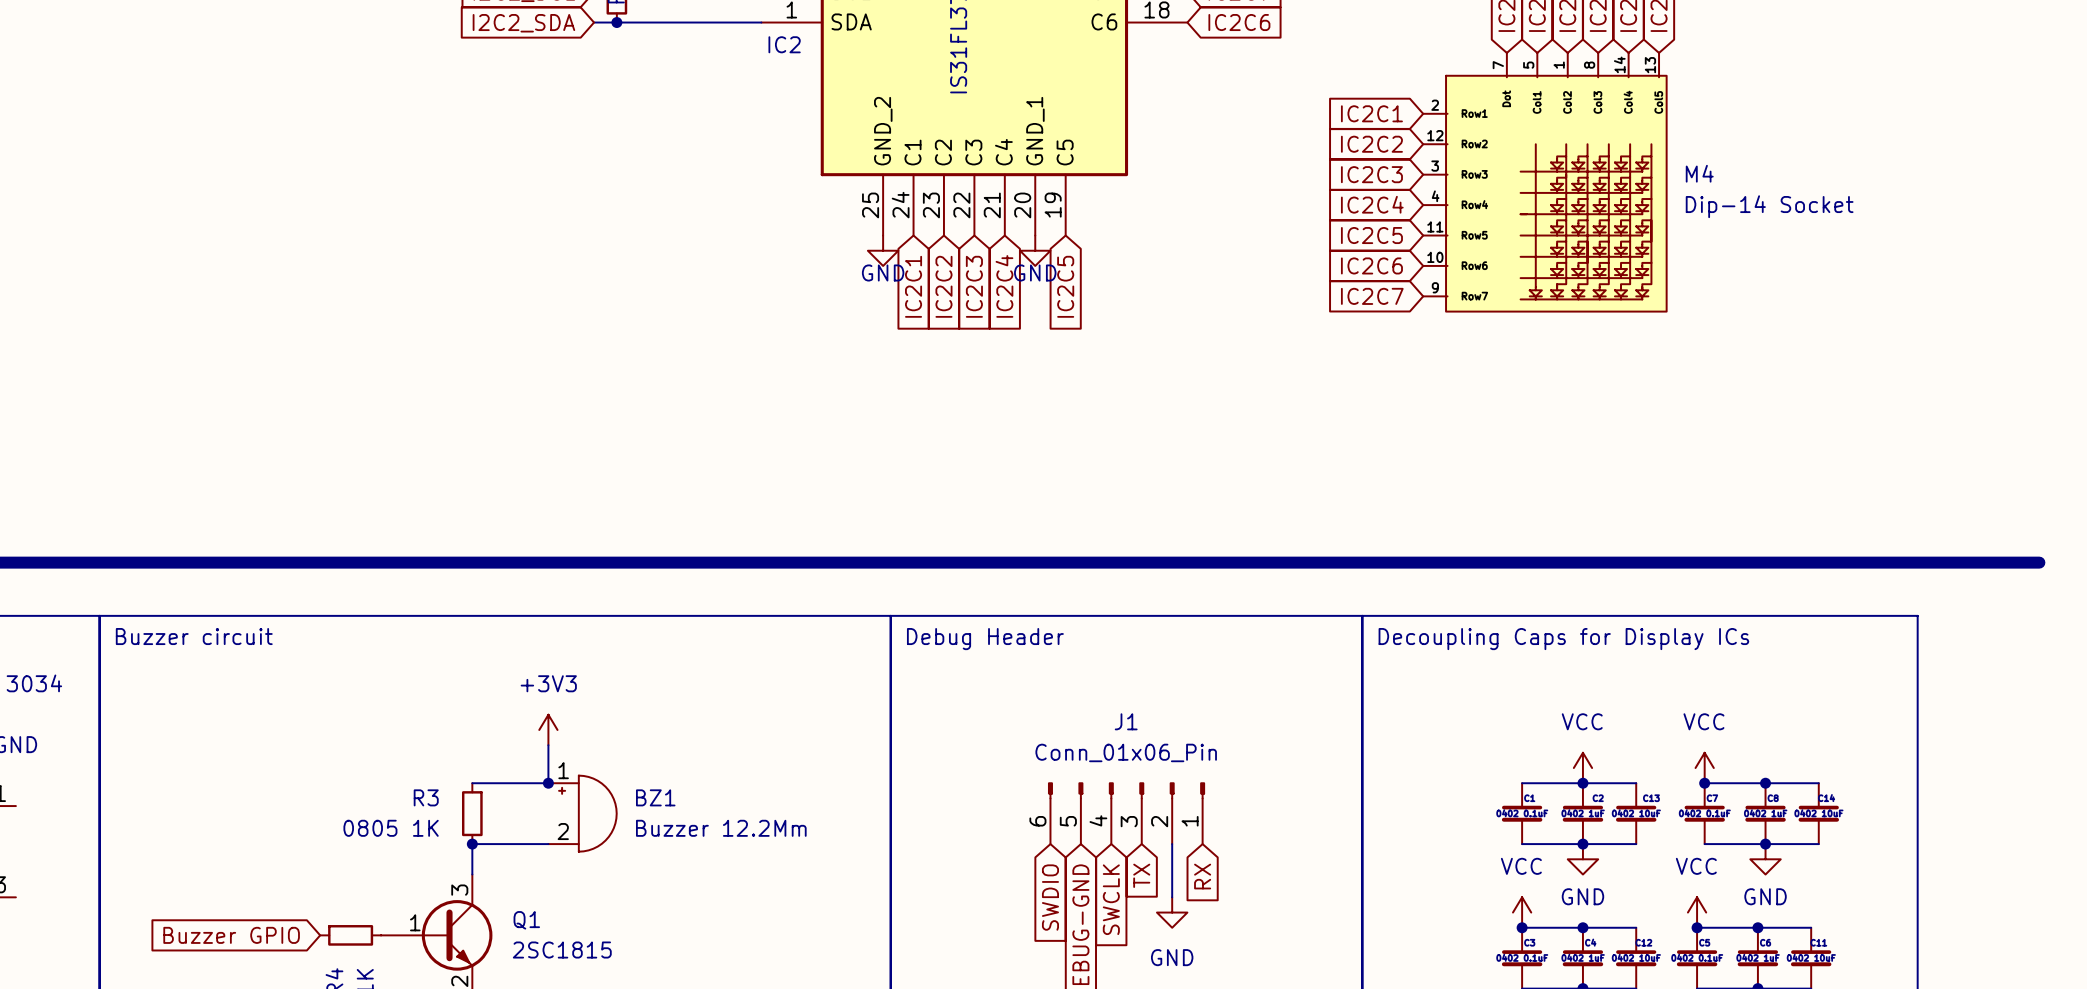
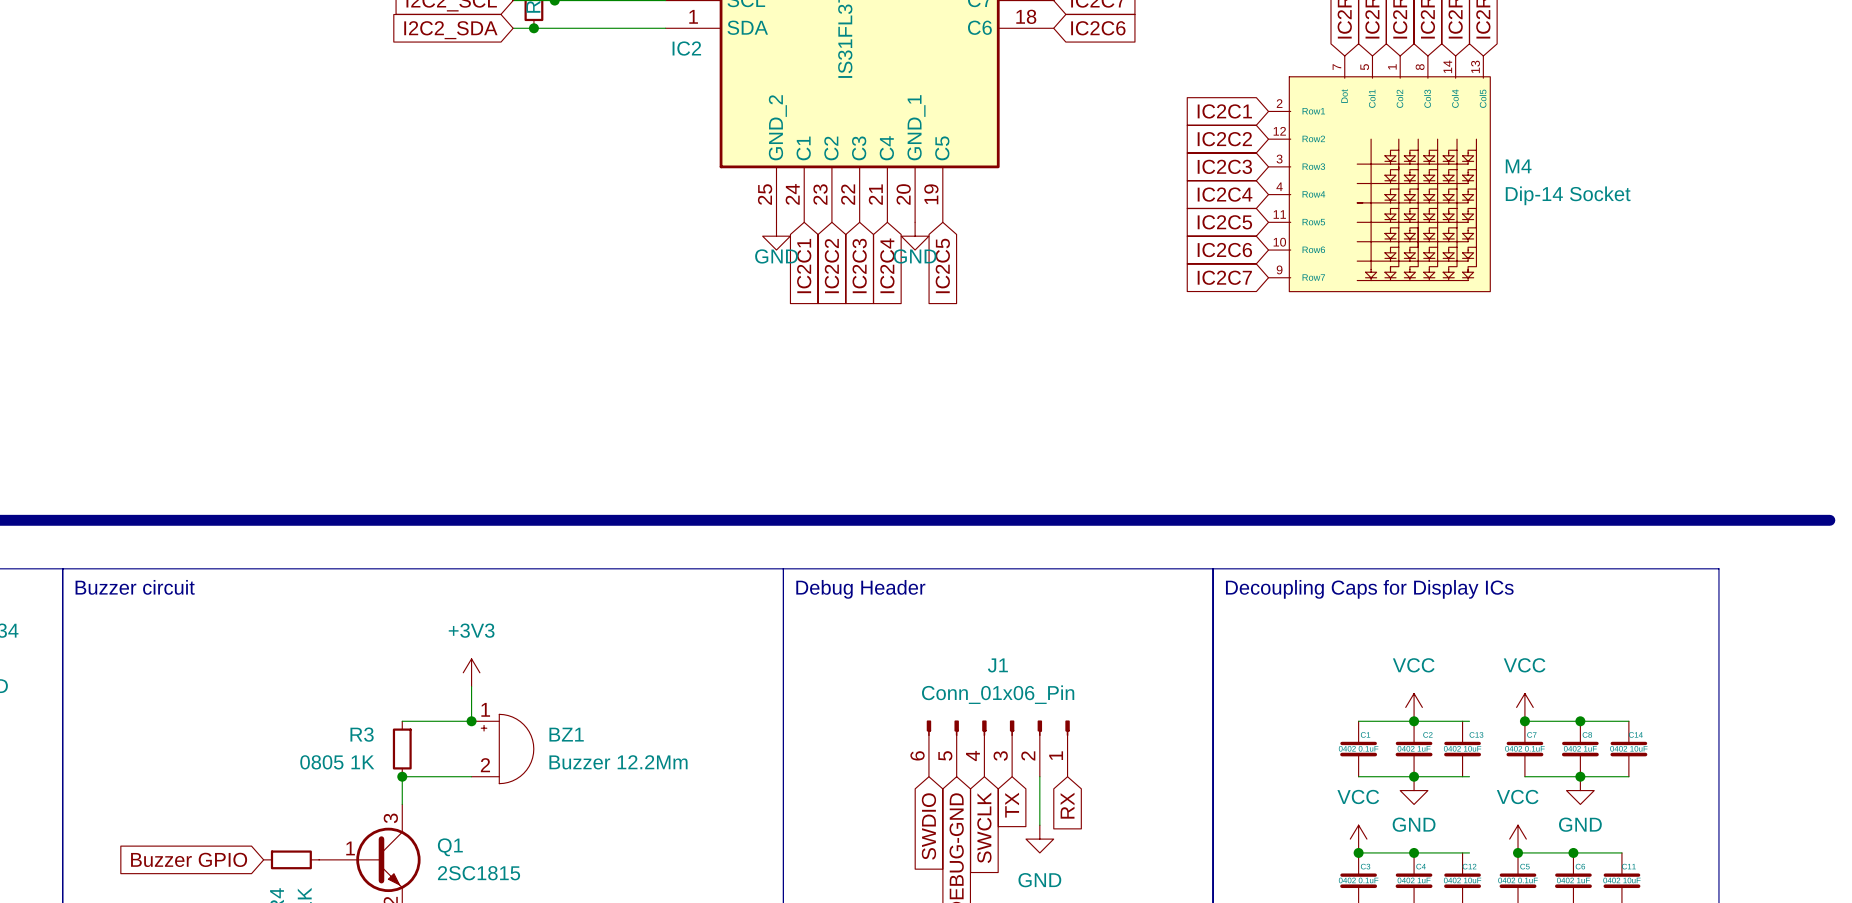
wire: none -> (1462, 721) (1469, 721)
wire: none -> (1462, 776) (1469, 776)
wire: none -> (1462, 852) (1469, 852)

